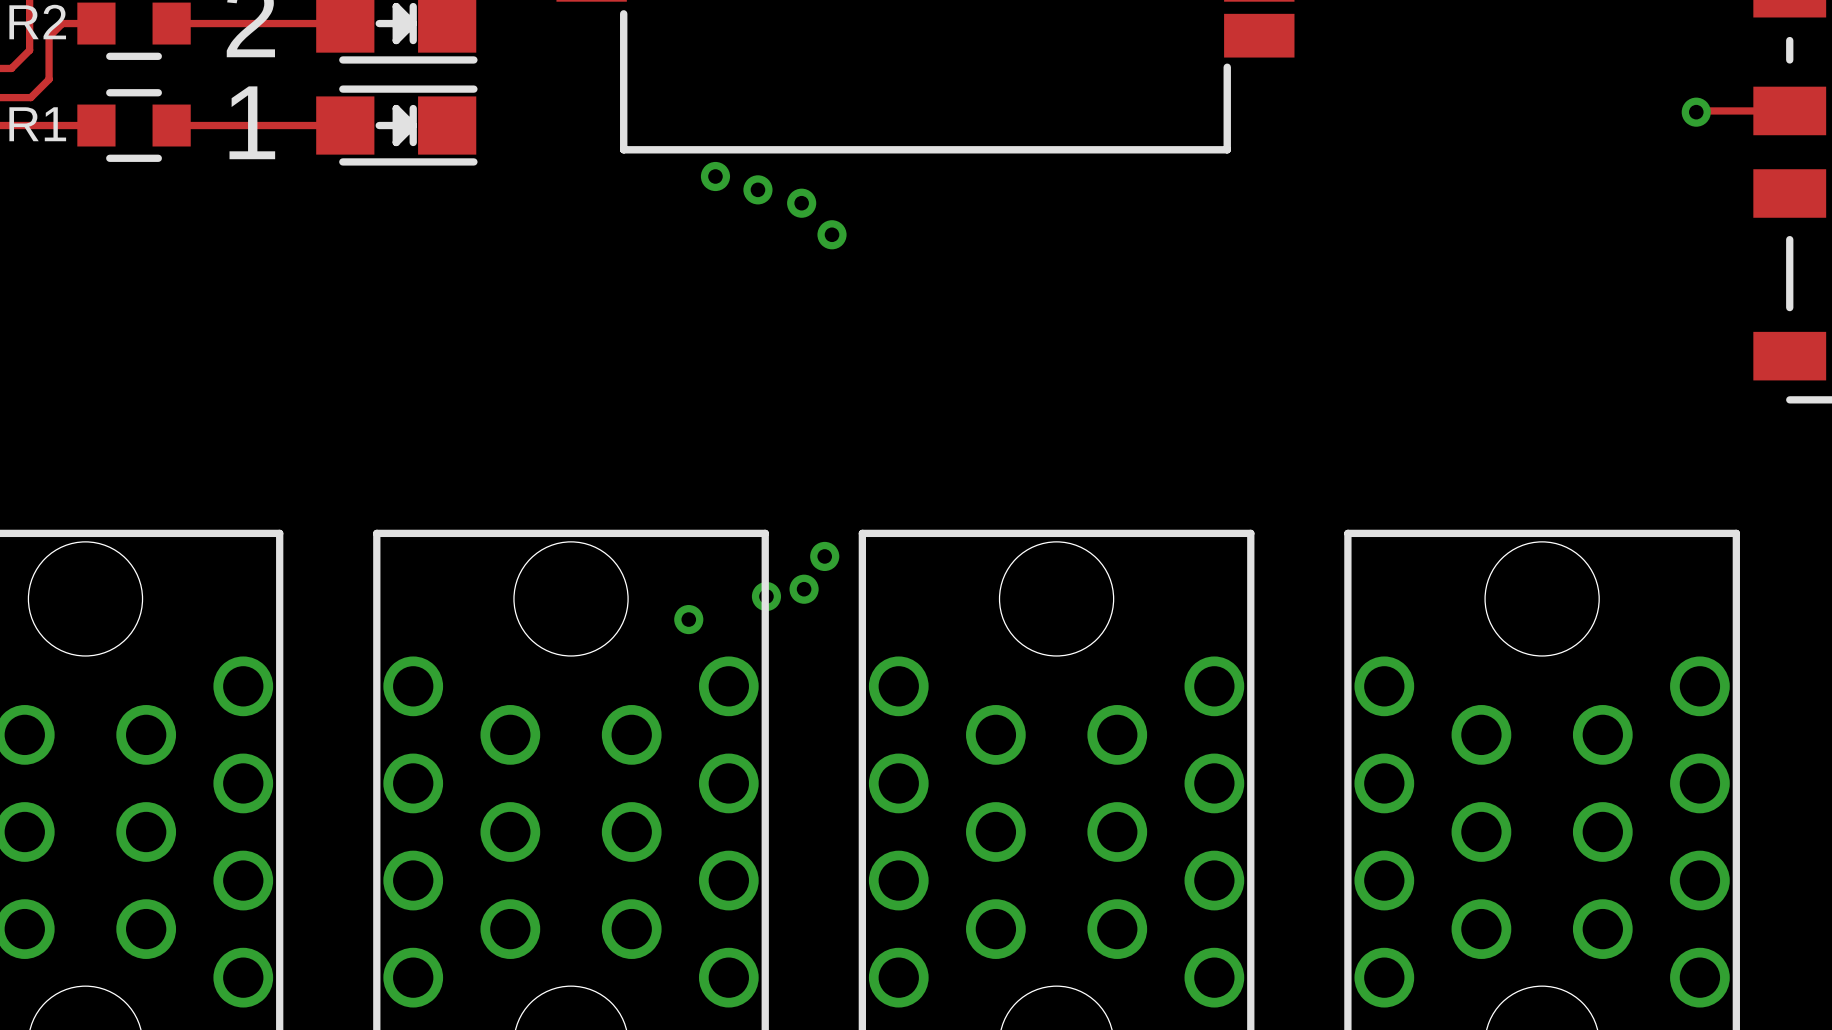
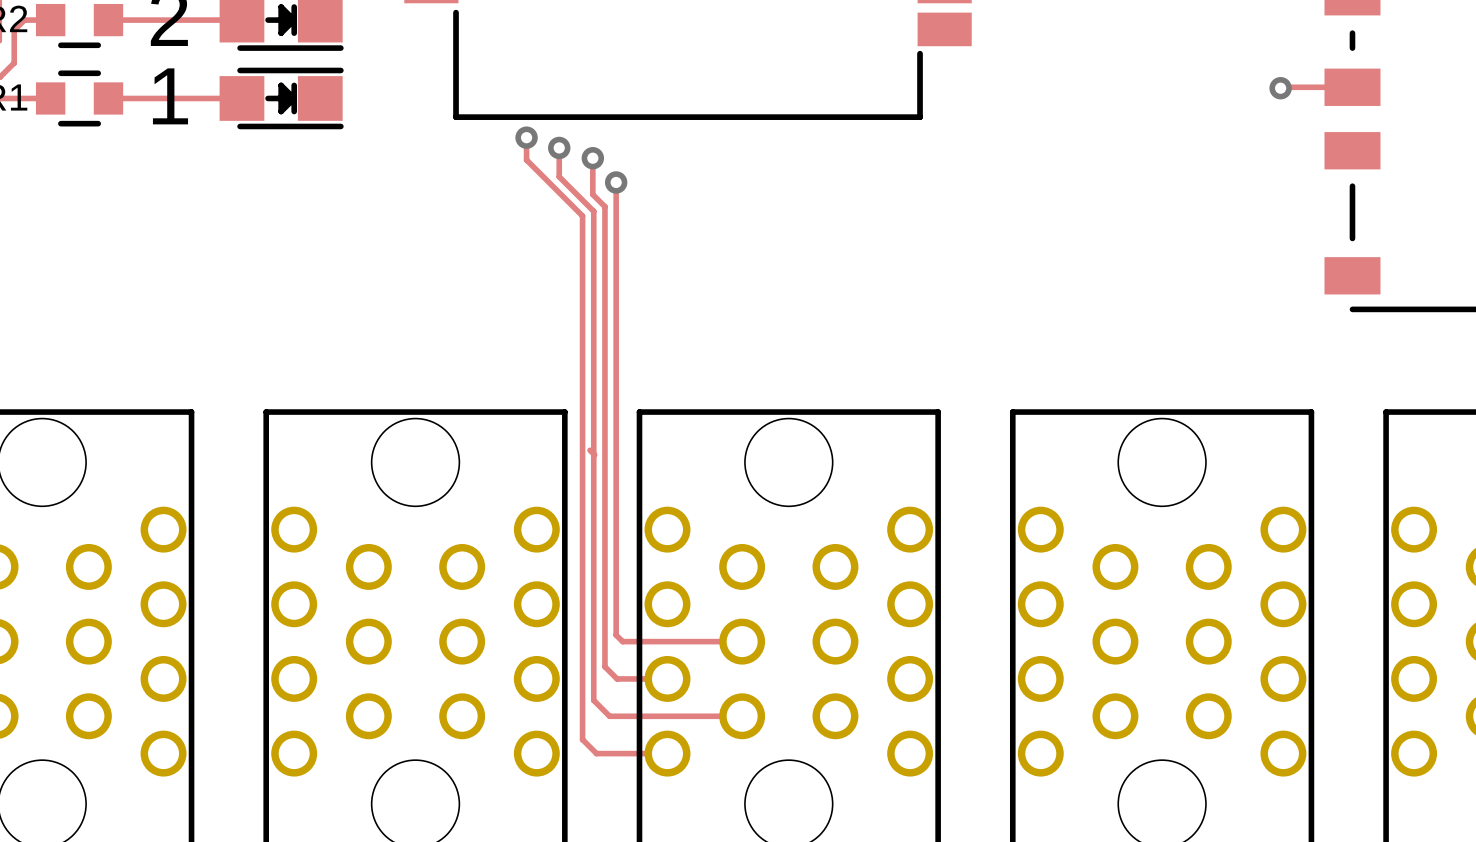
top track: none -> (526, 137) (526, 160) (582, 216) (582, 739) (596, 753) (667, 753)
top track: none -> (559, 147) (559, 176) (593, 211) (593, 700) (609, 716) (742, 716)
top track: none -> (592, 158) (592, 194) (604, 206) (604, 666) (617, 678) (667, 678)
top track: none -> (616, 182) (616, 635) (622, 641) (742, 641)
via: (824, 556) -> none
via: (804, 589) -> none
via: (766, 596) -> none
via: (688, 619) -> none

